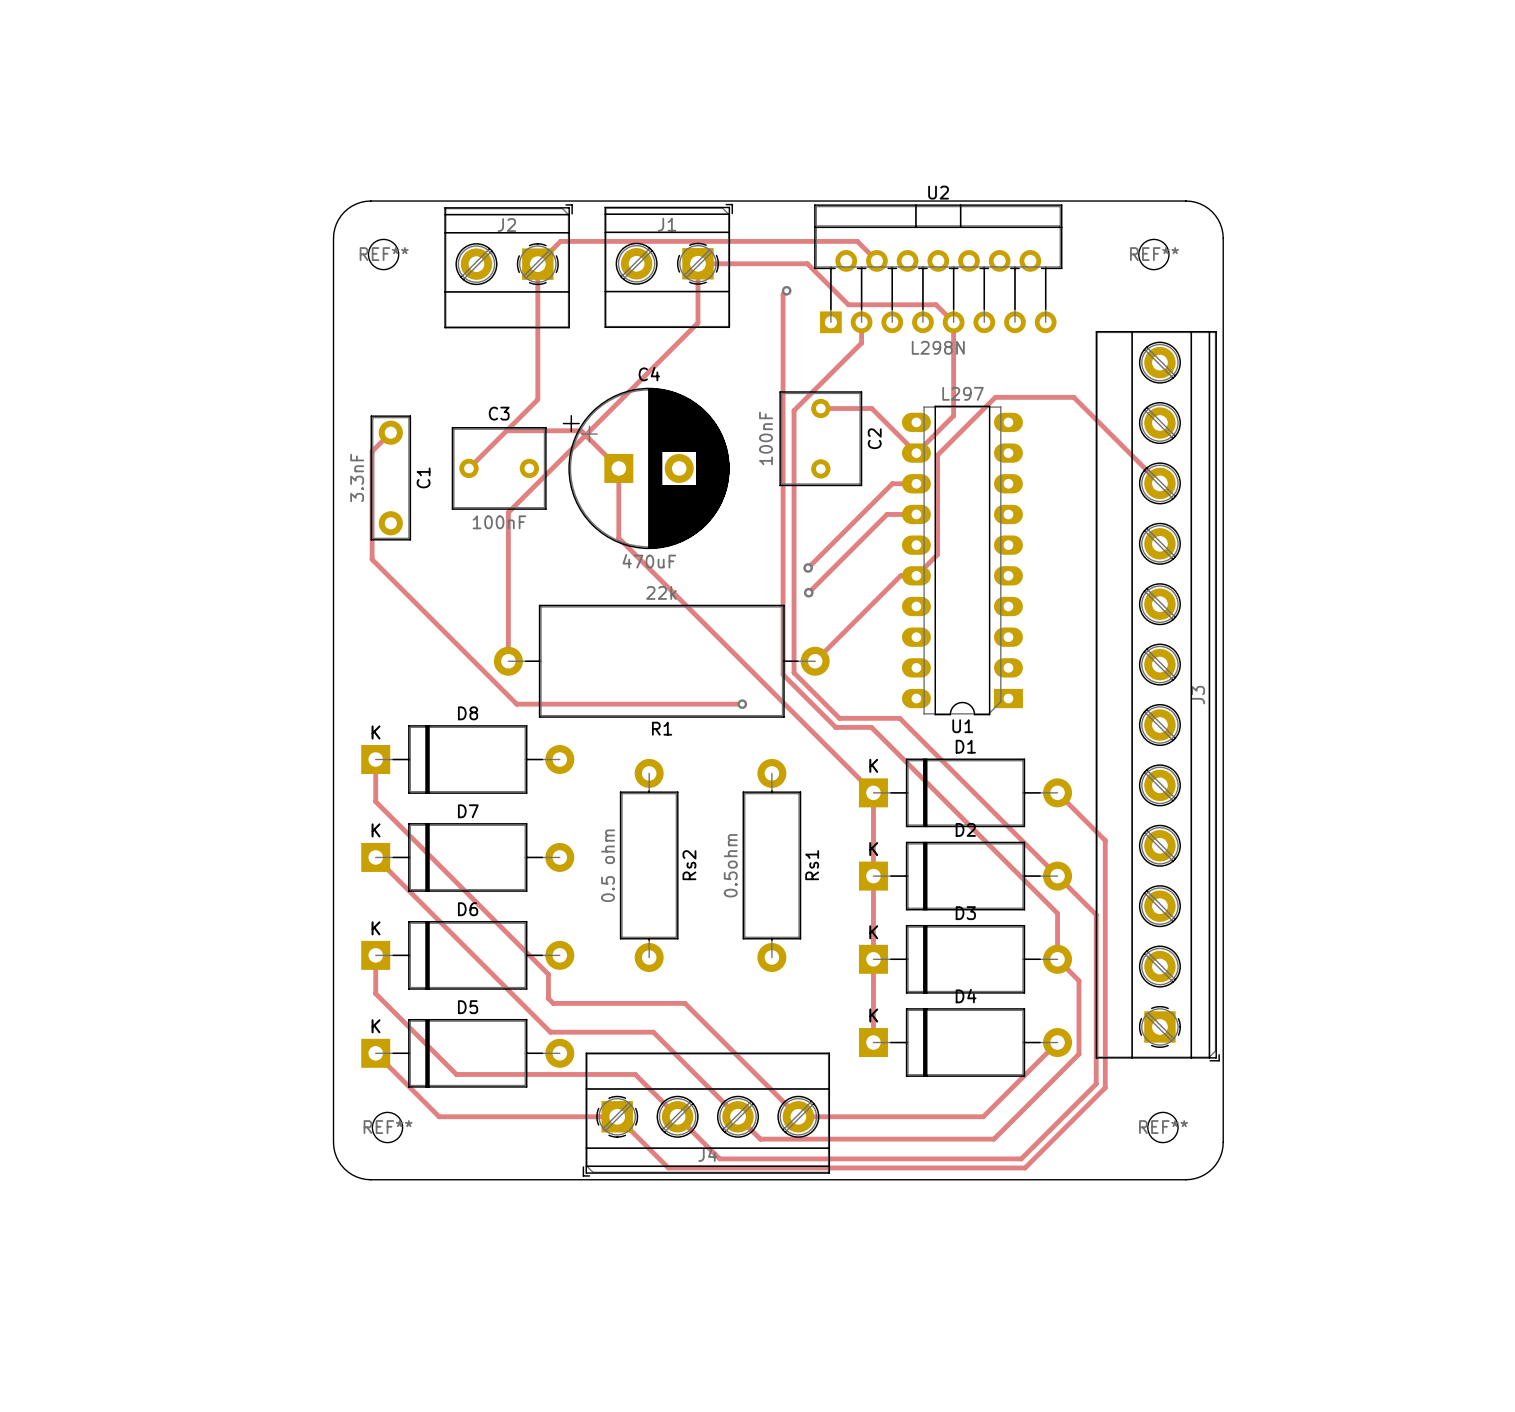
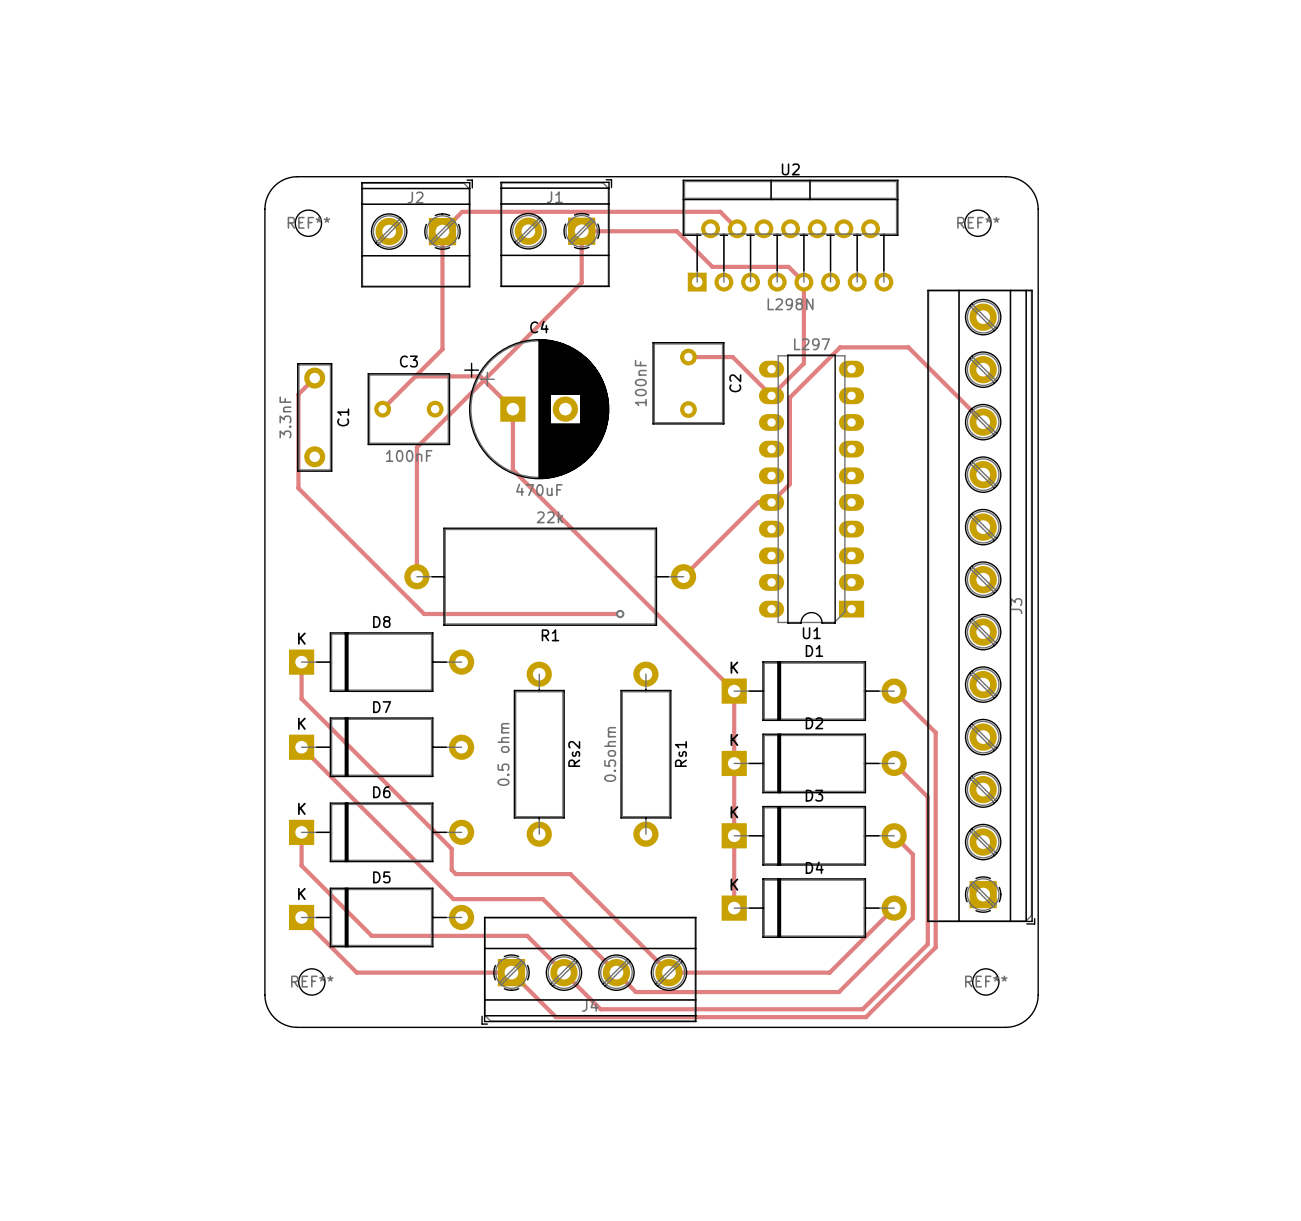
track: (786, 290) (783, 294) (783, 674) (835, 727) (871, 727) (1057, 913) (1057, 959) -> none
via: (786, 290) -> none
track: (861, 322) (861, 343) (794, 410) (794, 672) (839, 718) (899, 718) (1057, 876) -> none
track: (916, 483) (892, 483) (808, 567) -> none
track: (916, 514) (887, 514) (808, 592) -> none
via: (808, 567) -> none
via: (808, 592) -> none

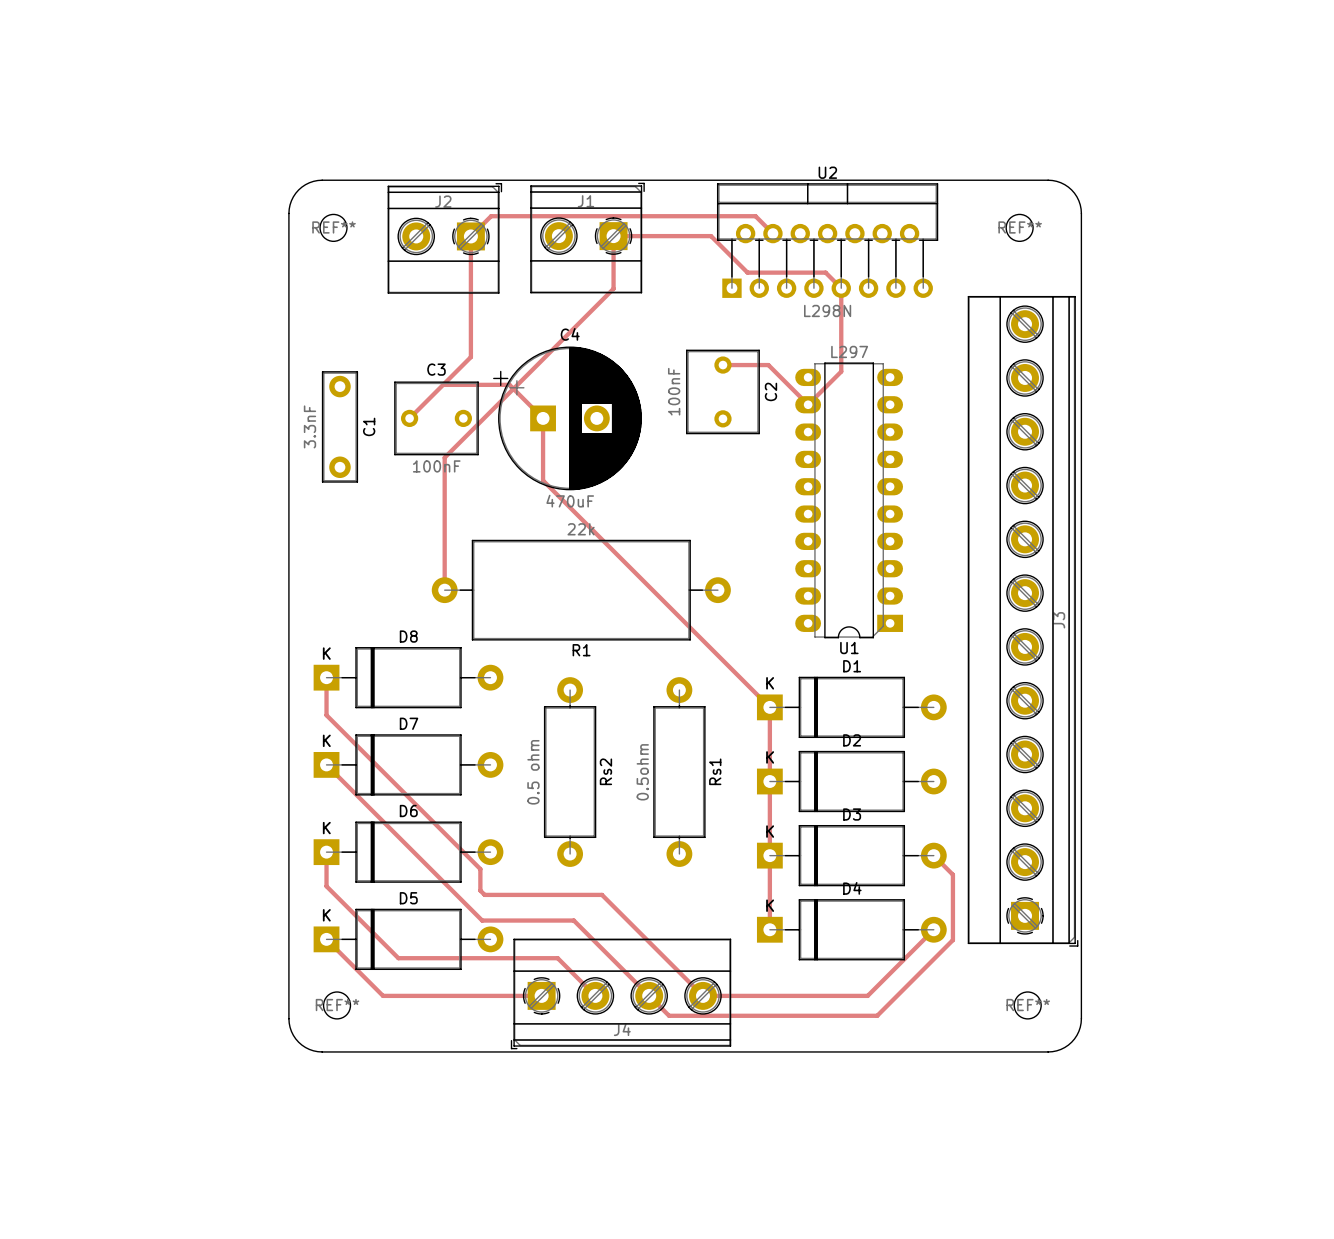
track: (314, 378) (298, 394) (298, 488) (424, 614) (620, 614) -> none
track: (983, 422) (908, 347) (840, 347) (789, 397) (789, 484) (771, 502) (757, 502) (683, 576) -> none
via: (620, 614) -> none
track: (894, 691) (935, 732) (935, 947) (865, 1017) (555, 1017) (511, 972) -> none
track: (894, 763) (927, 797) (927, 944) (862, 1009) (600, 1009) (563, 972) -> none

